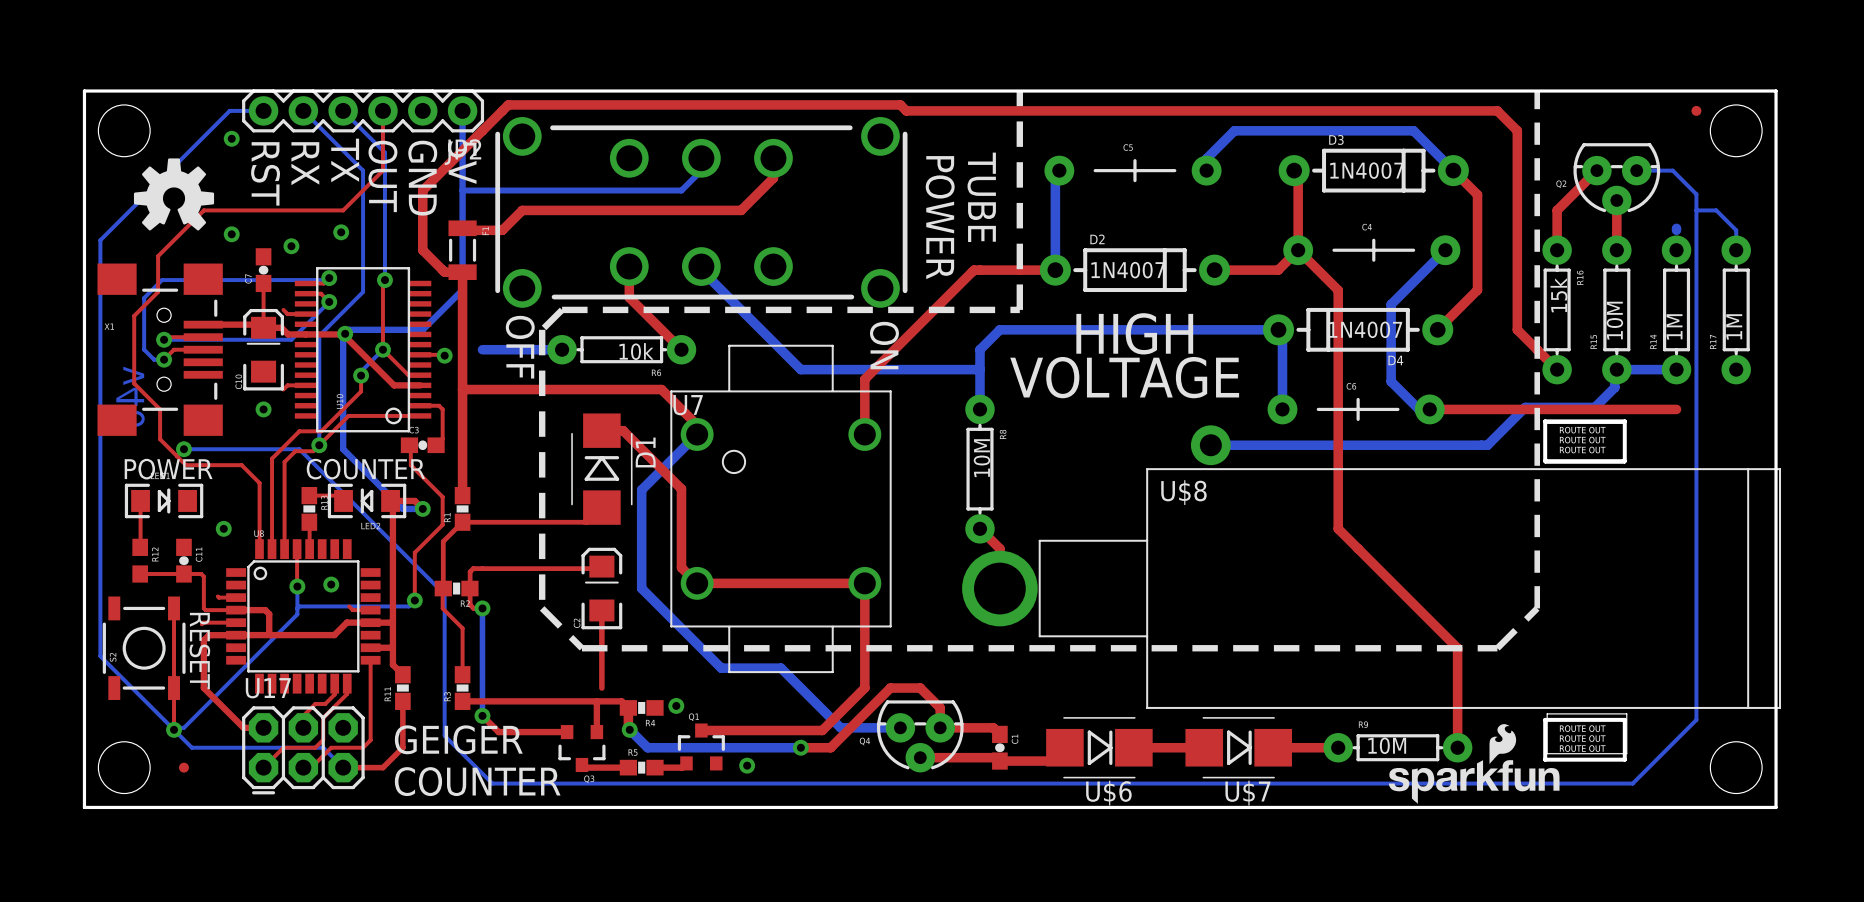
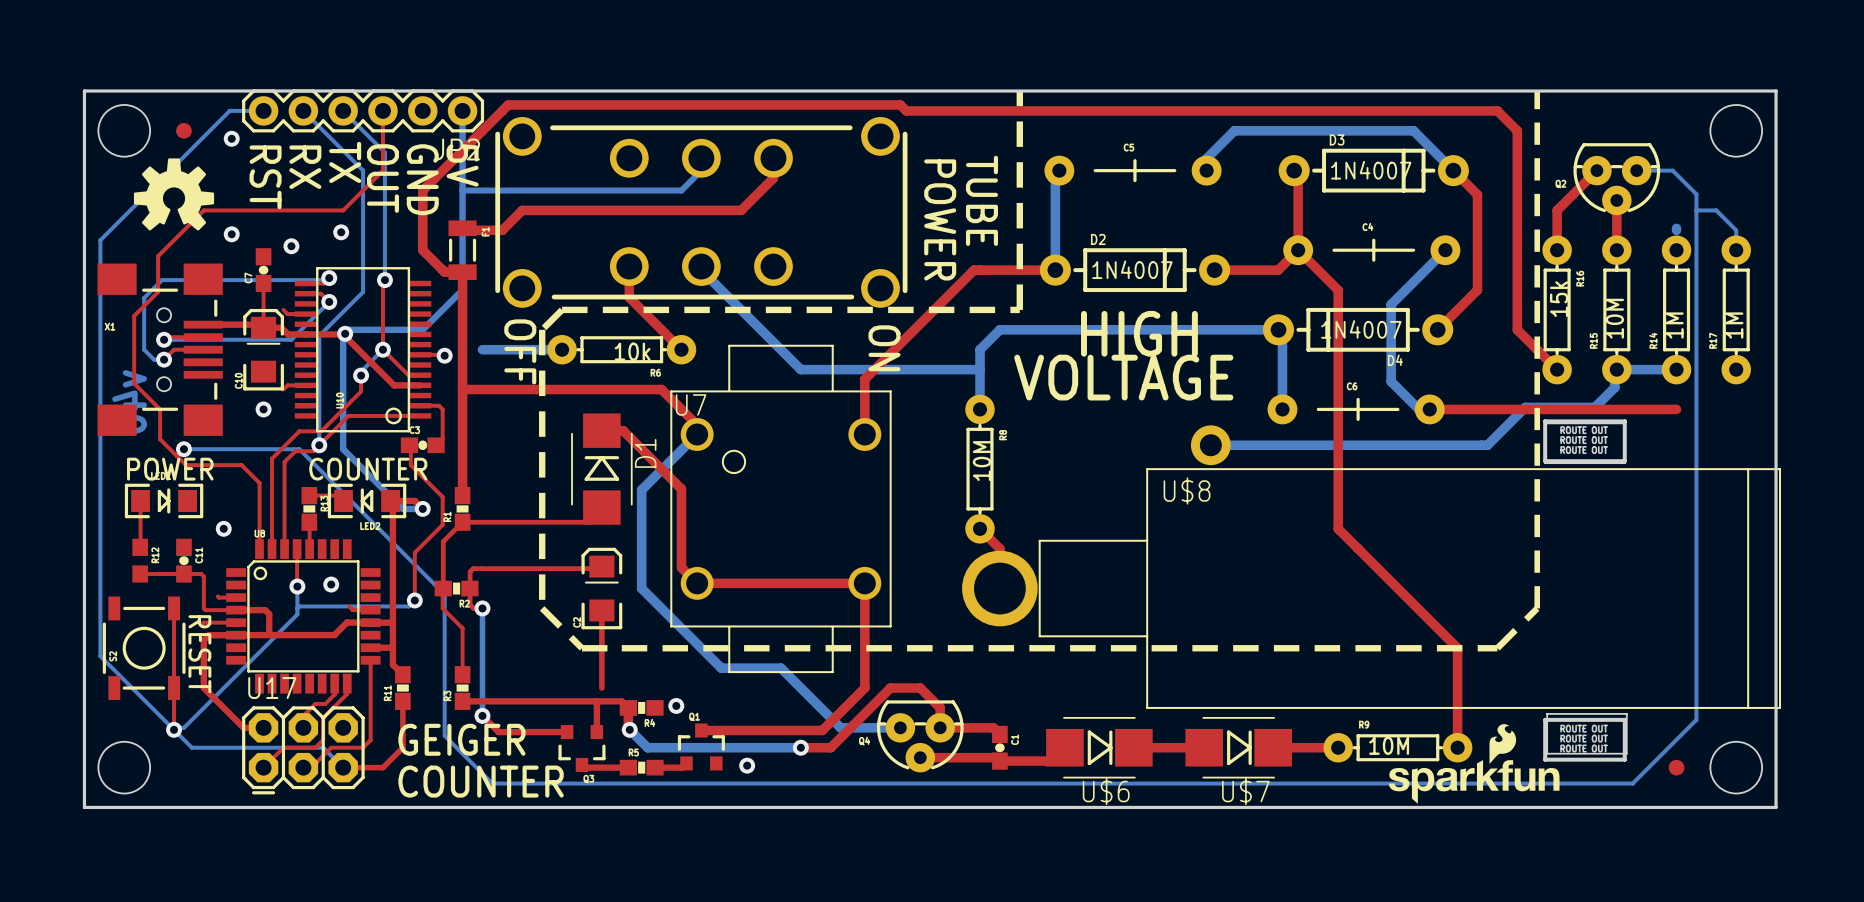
part: (1696, 110) -> none
part: none -> (183, 130)
part: (183, 767) -> none
part: none -> (1676, 767)

